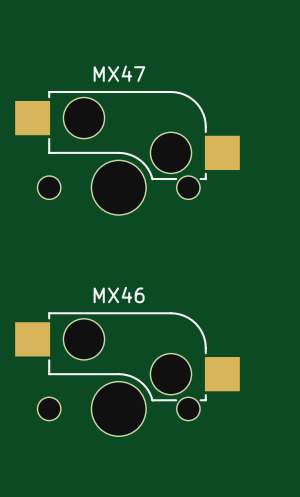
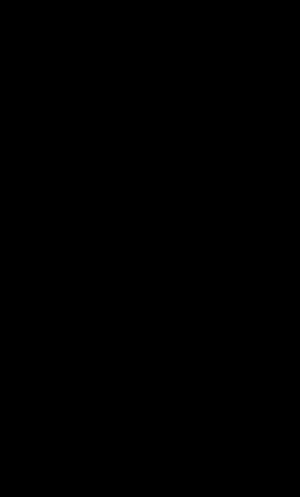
MX47: (127, 152) -> none
MX46: (127, 374) -> none

